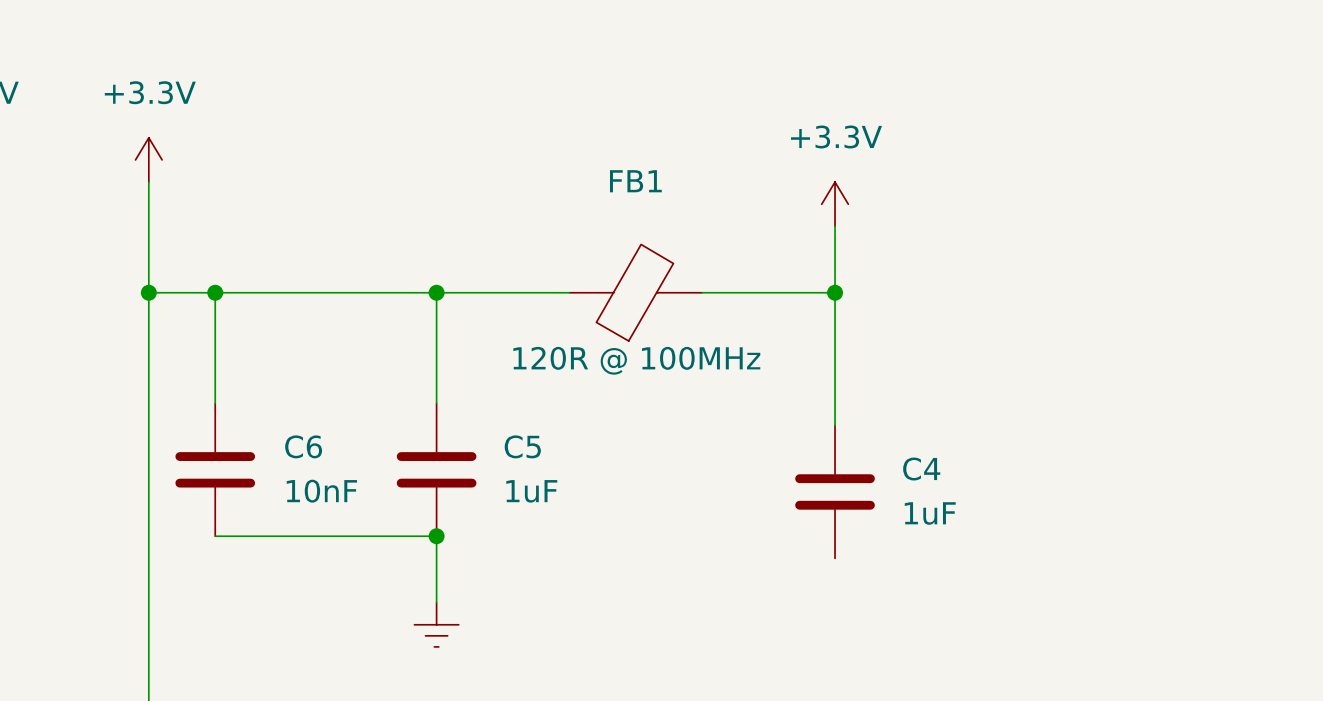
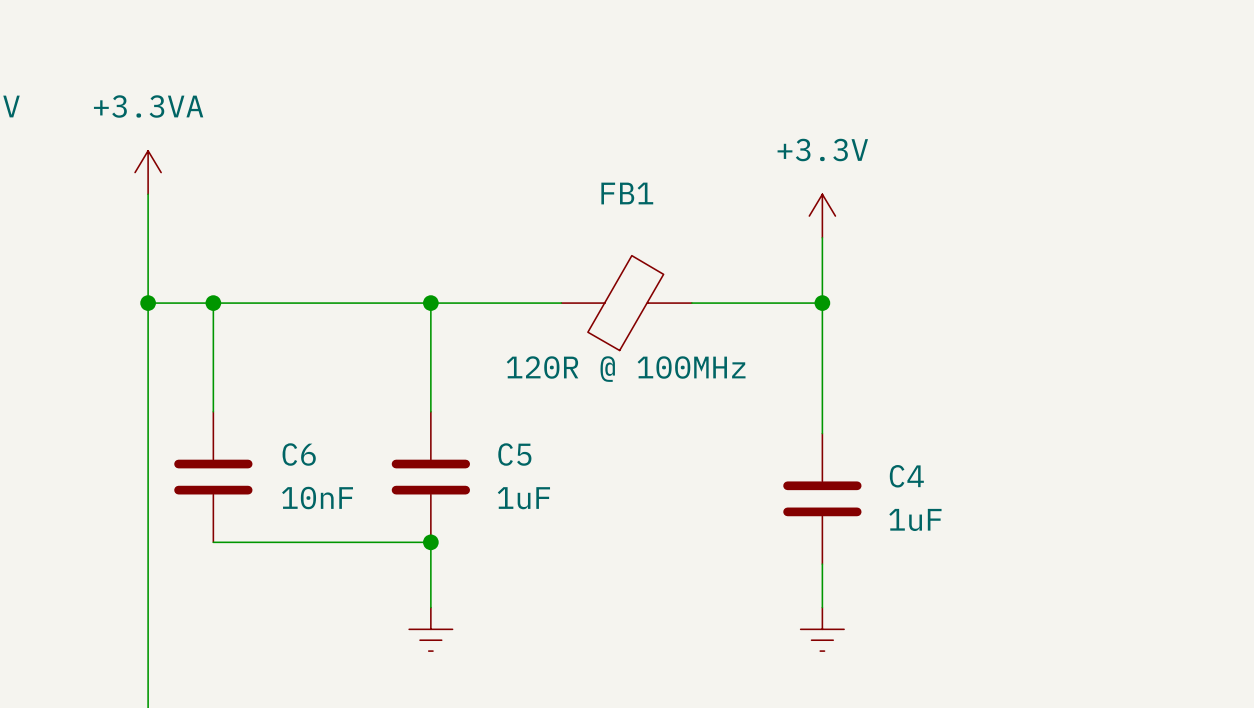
power symbol: +3.3V (148, 159) -> +3.3VA (148, 172)
wire: none -> (822, 564) (822, 607)
power symbol: none -> (822, 629)

